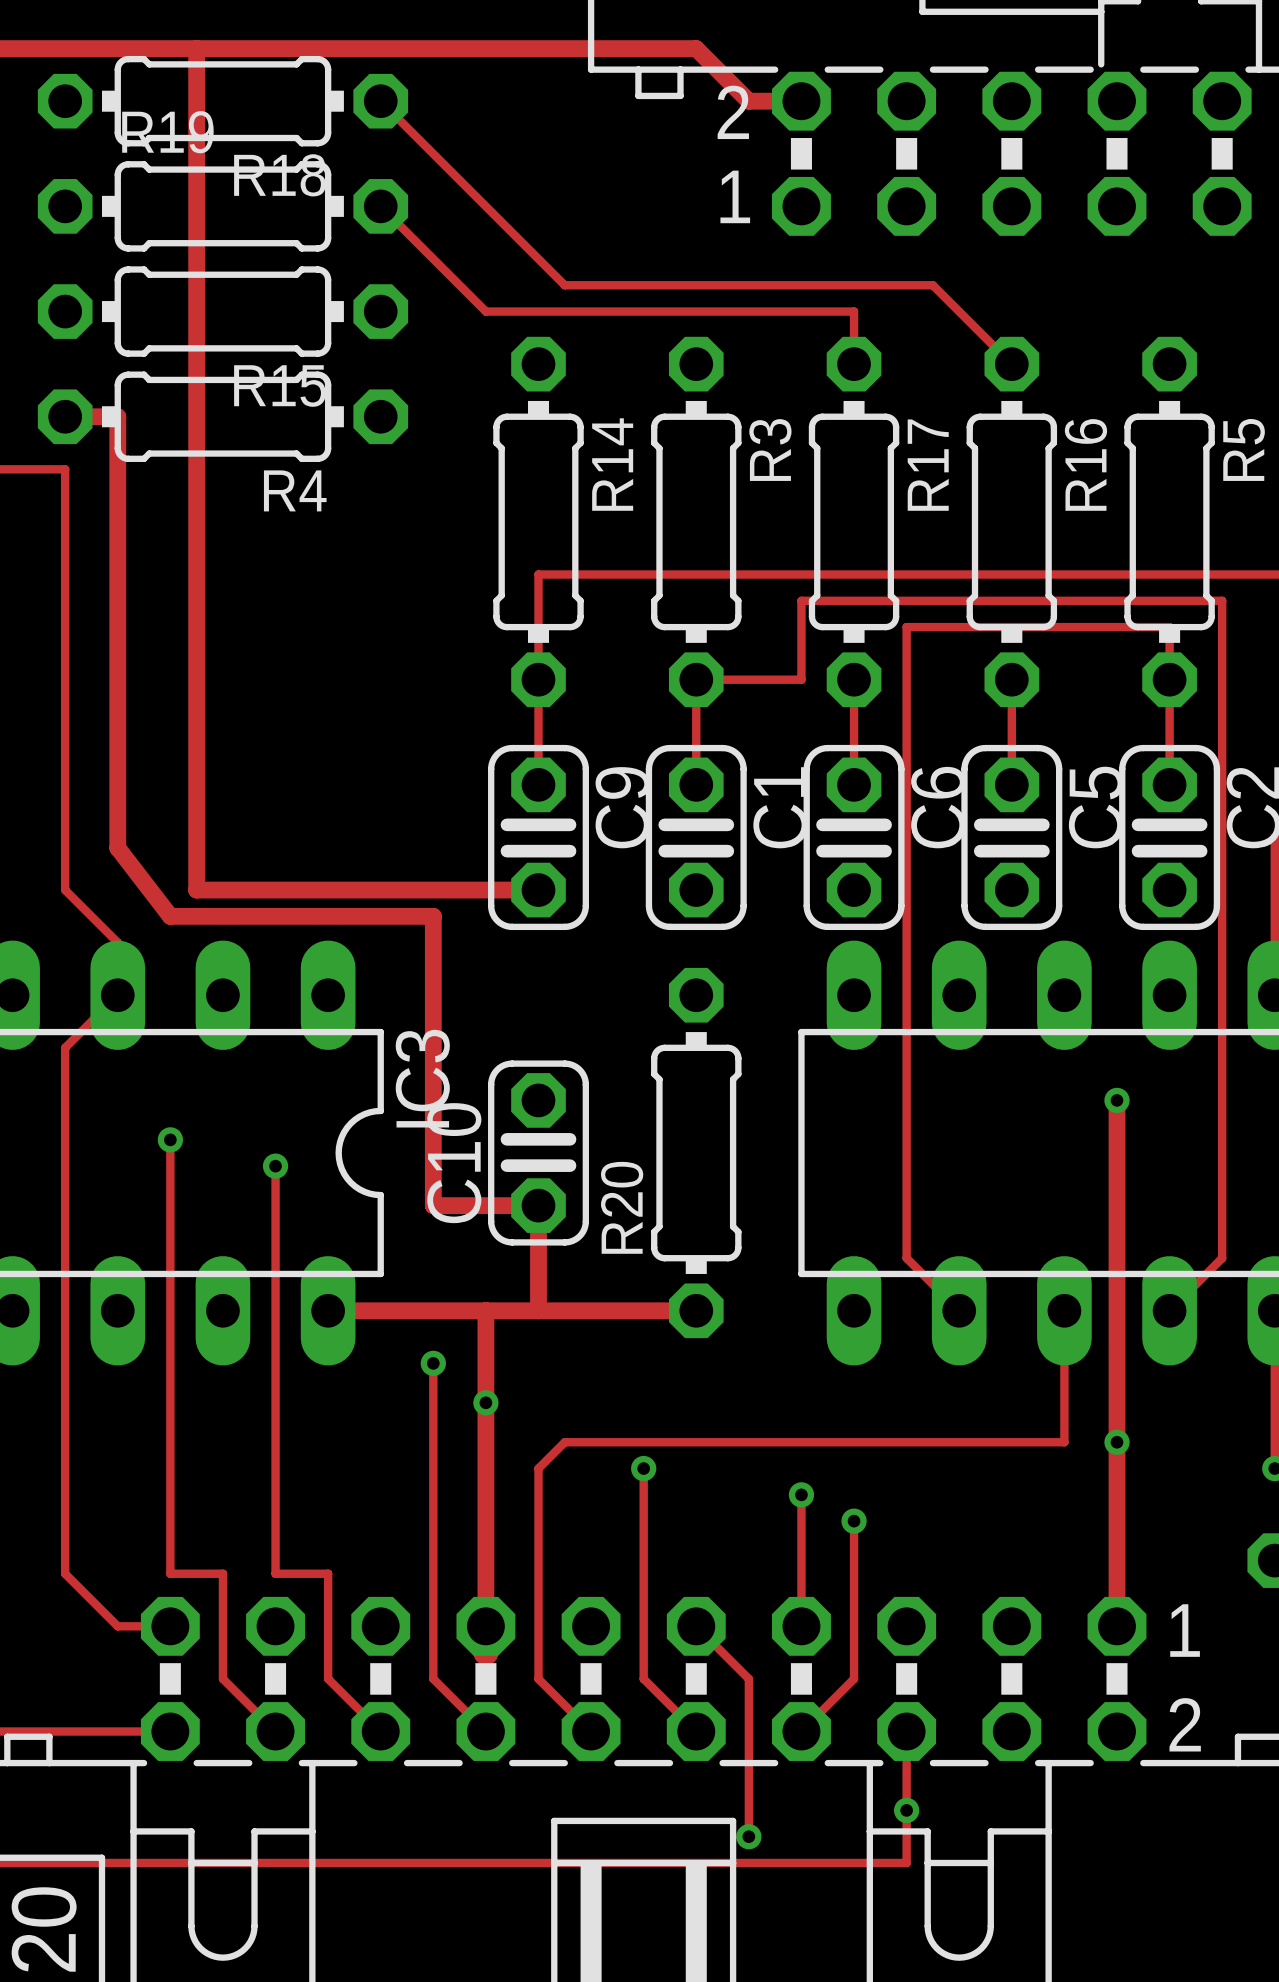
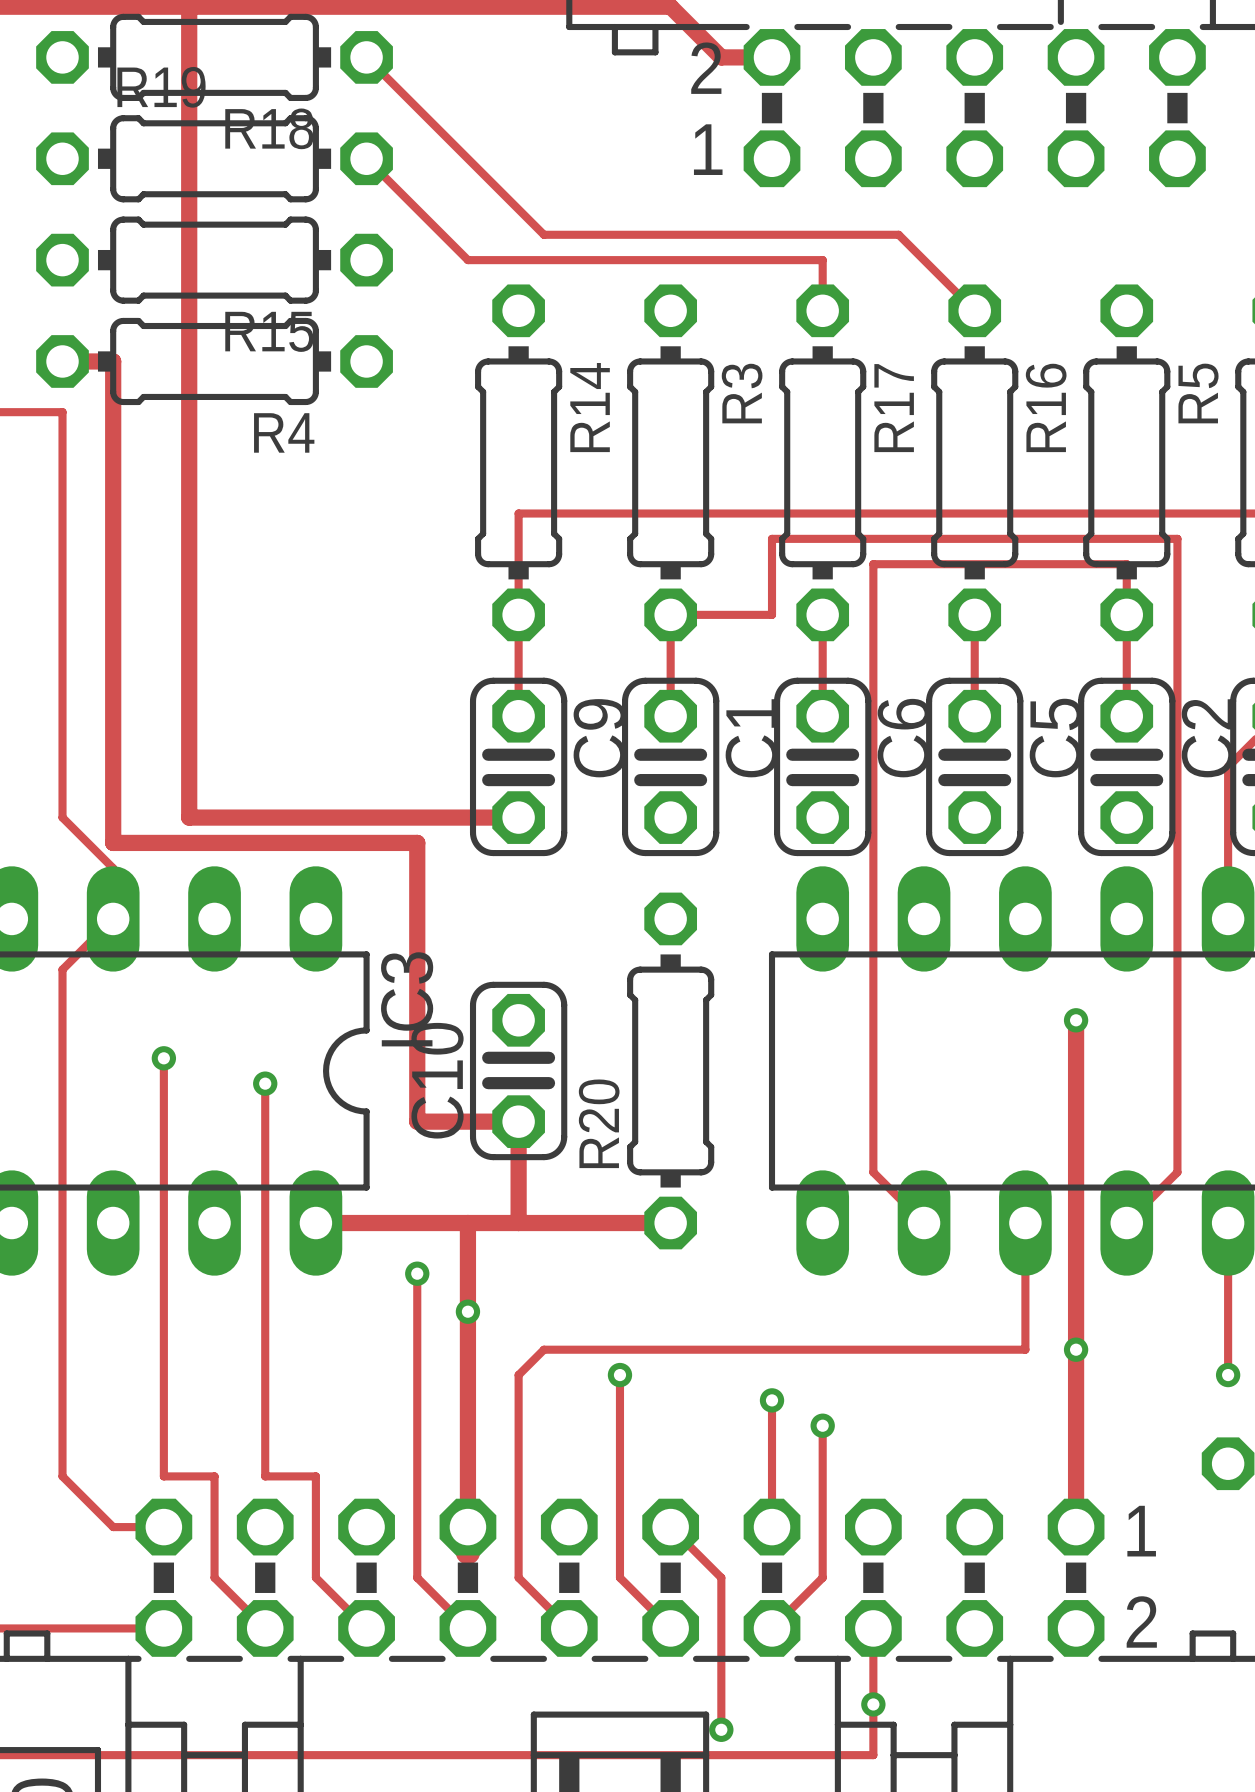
track: (117, 847) (170, 916) -> (113, 777) (113, 842) (163, 842)

